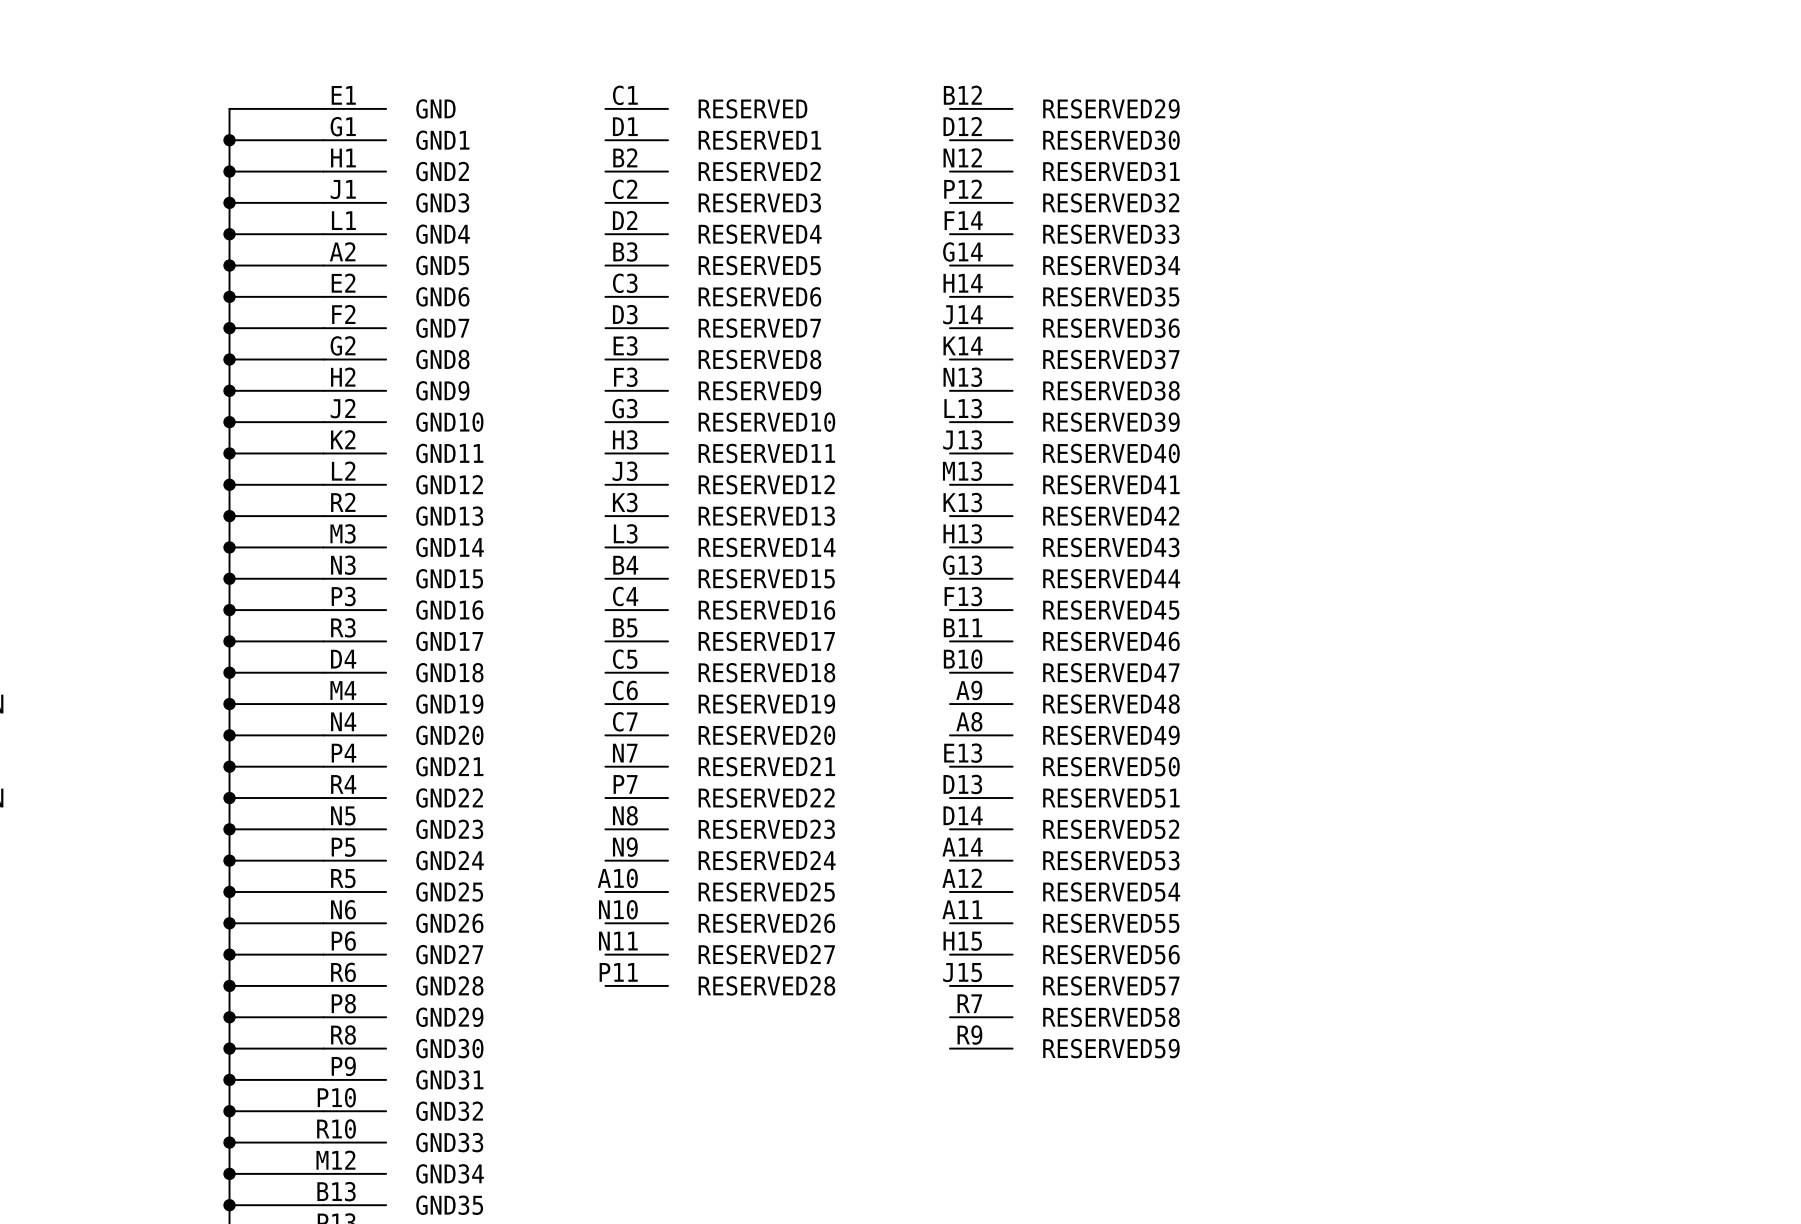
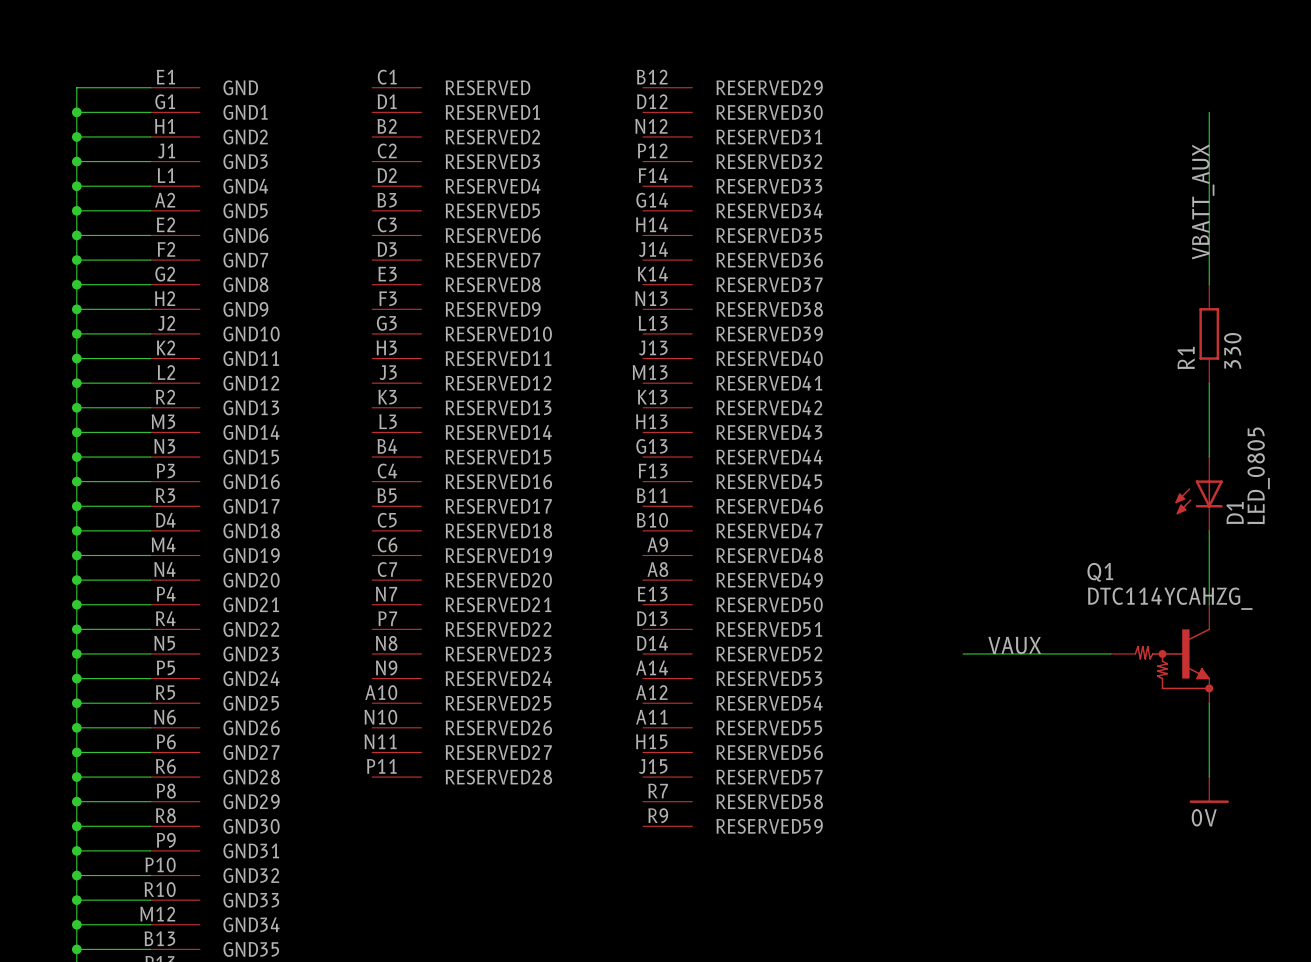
wire: none -> (1209, 112) (1209, 284)
label: none -> VBATT_AUX (1203, 201)
R1: none -> 330 (1209, 333)
wire: none -> (1209, 383) (1209, 457)
D1: none -> LED_0805 (1199, 493)
wire: none -> (1209, 530) (1209, 604)
label: none -> VAUX (1014, 645)
wire: none -> (963, 653) (1110, 653)
Q1: none -> DTC114YCAHZG_ (1161, 653)
wire: none -> (1209, 703) (1209, 777)
power symbol: none -> 0V (1209, 789)

